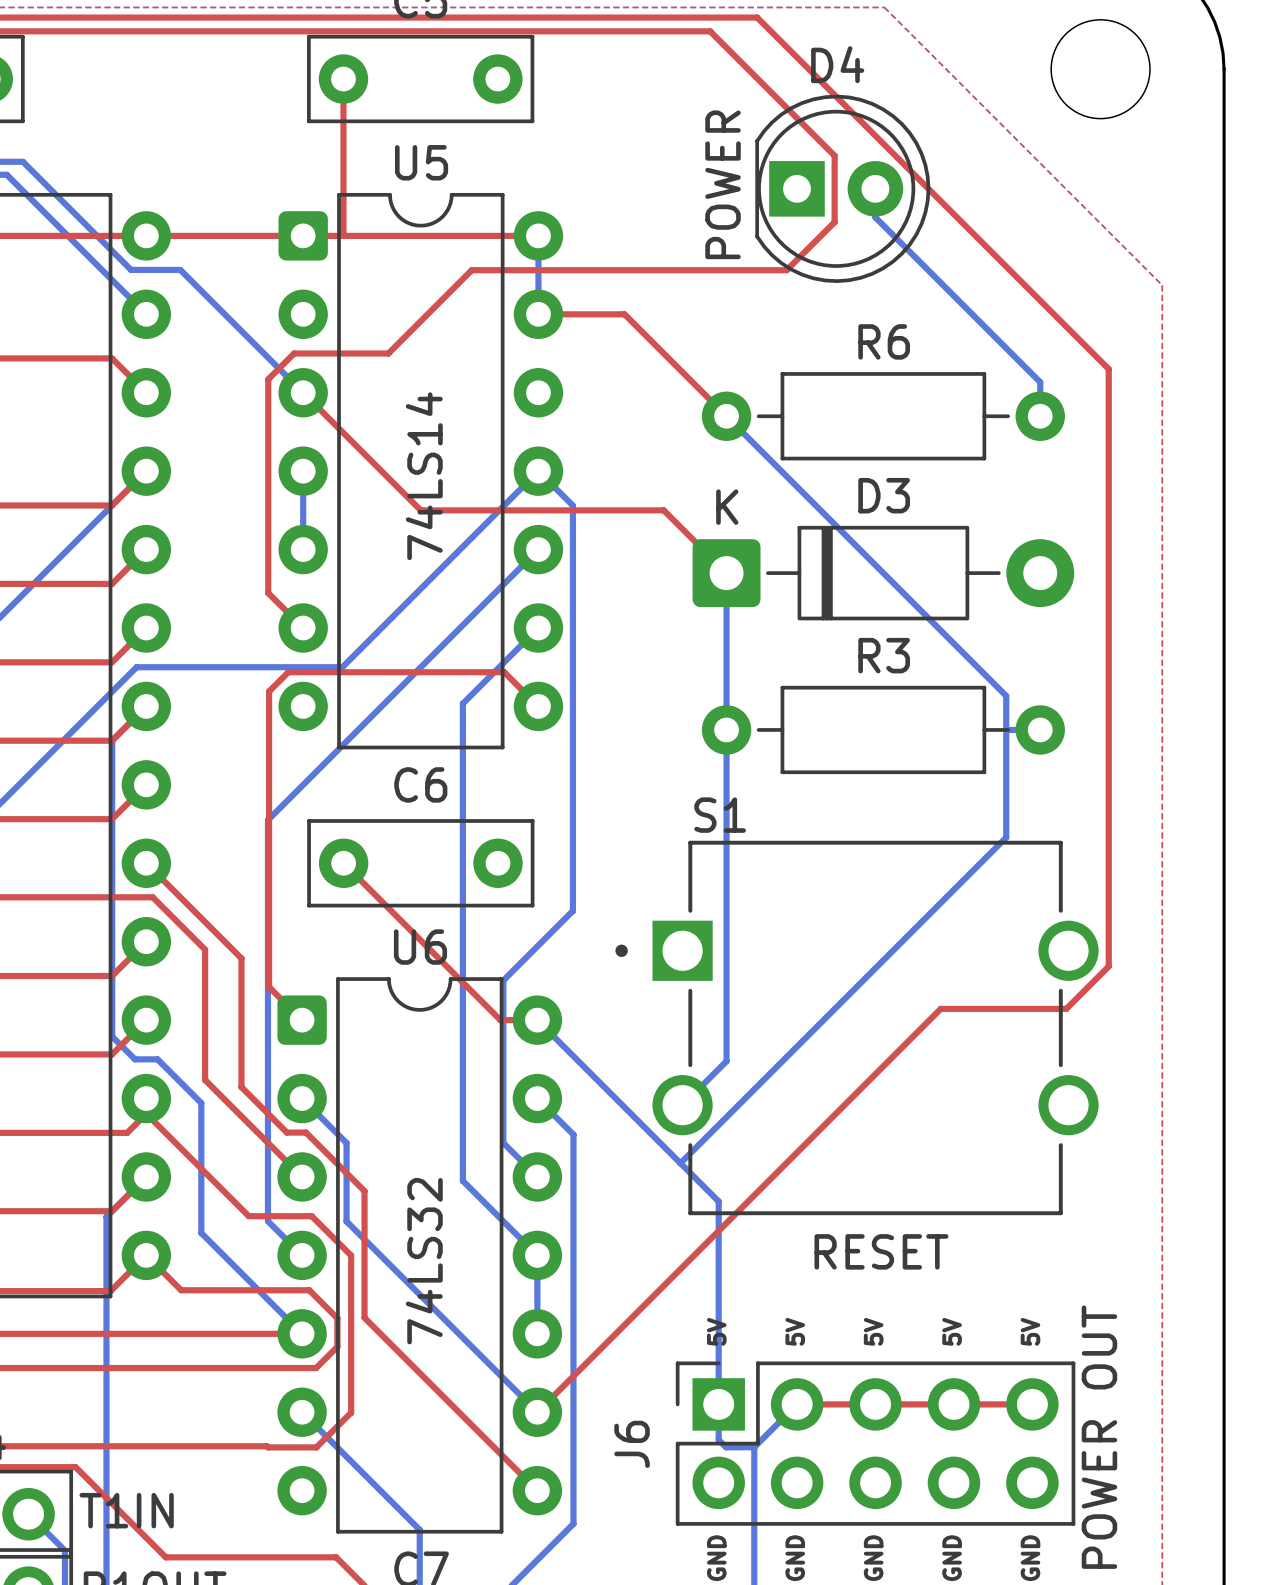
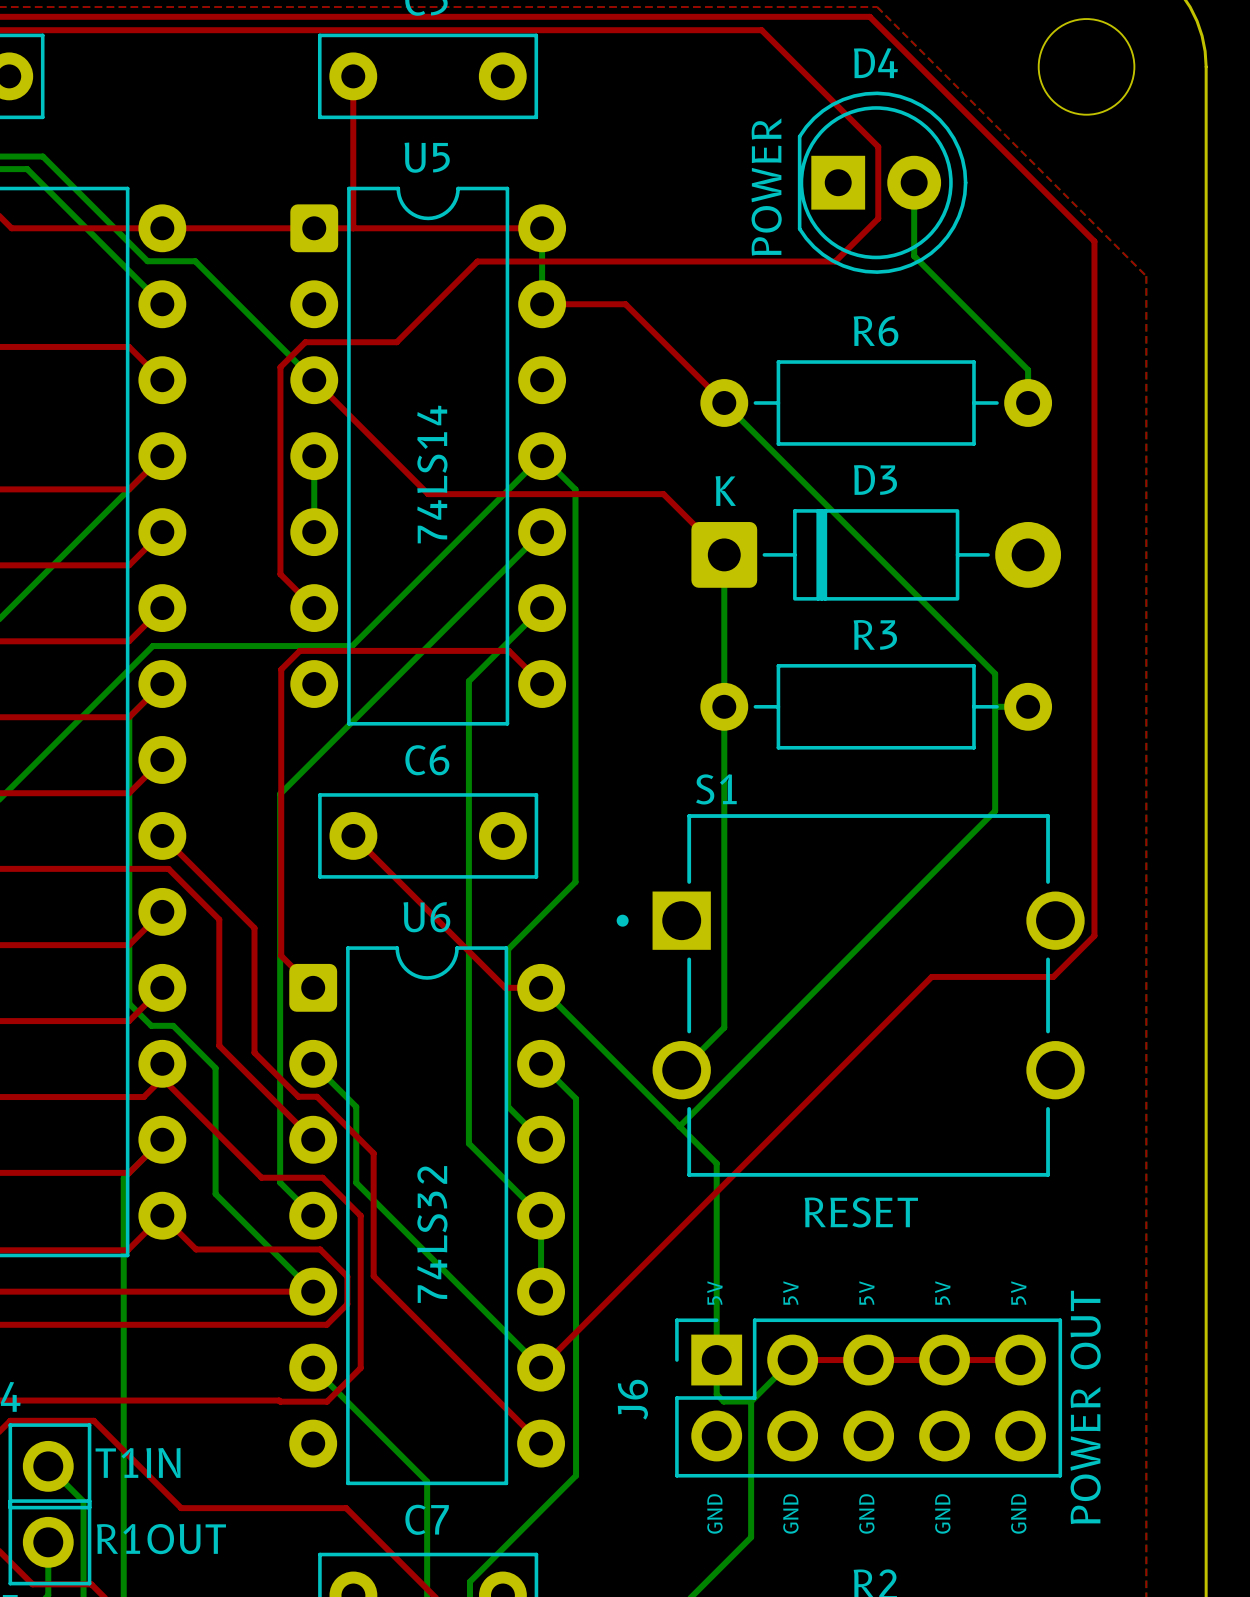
top track: (757, 17) (1108, 369) -> (753, 16) (869, 16) (1094, 241) (1094, 357)
top track: (710, 31) (834, 155) (834, 222) (786, 270) -> (708, 30) (761, 30) (878, 146) (878, 218) (835, 261) (782, 261)
text position: POWER (723, 184) -> POWER (766, 186)
D4 position: (842, 188) -> (882, 182)
bottom track: (875, 188) (875, 217) (922, 264) -> (914, 182) (914, 256)

